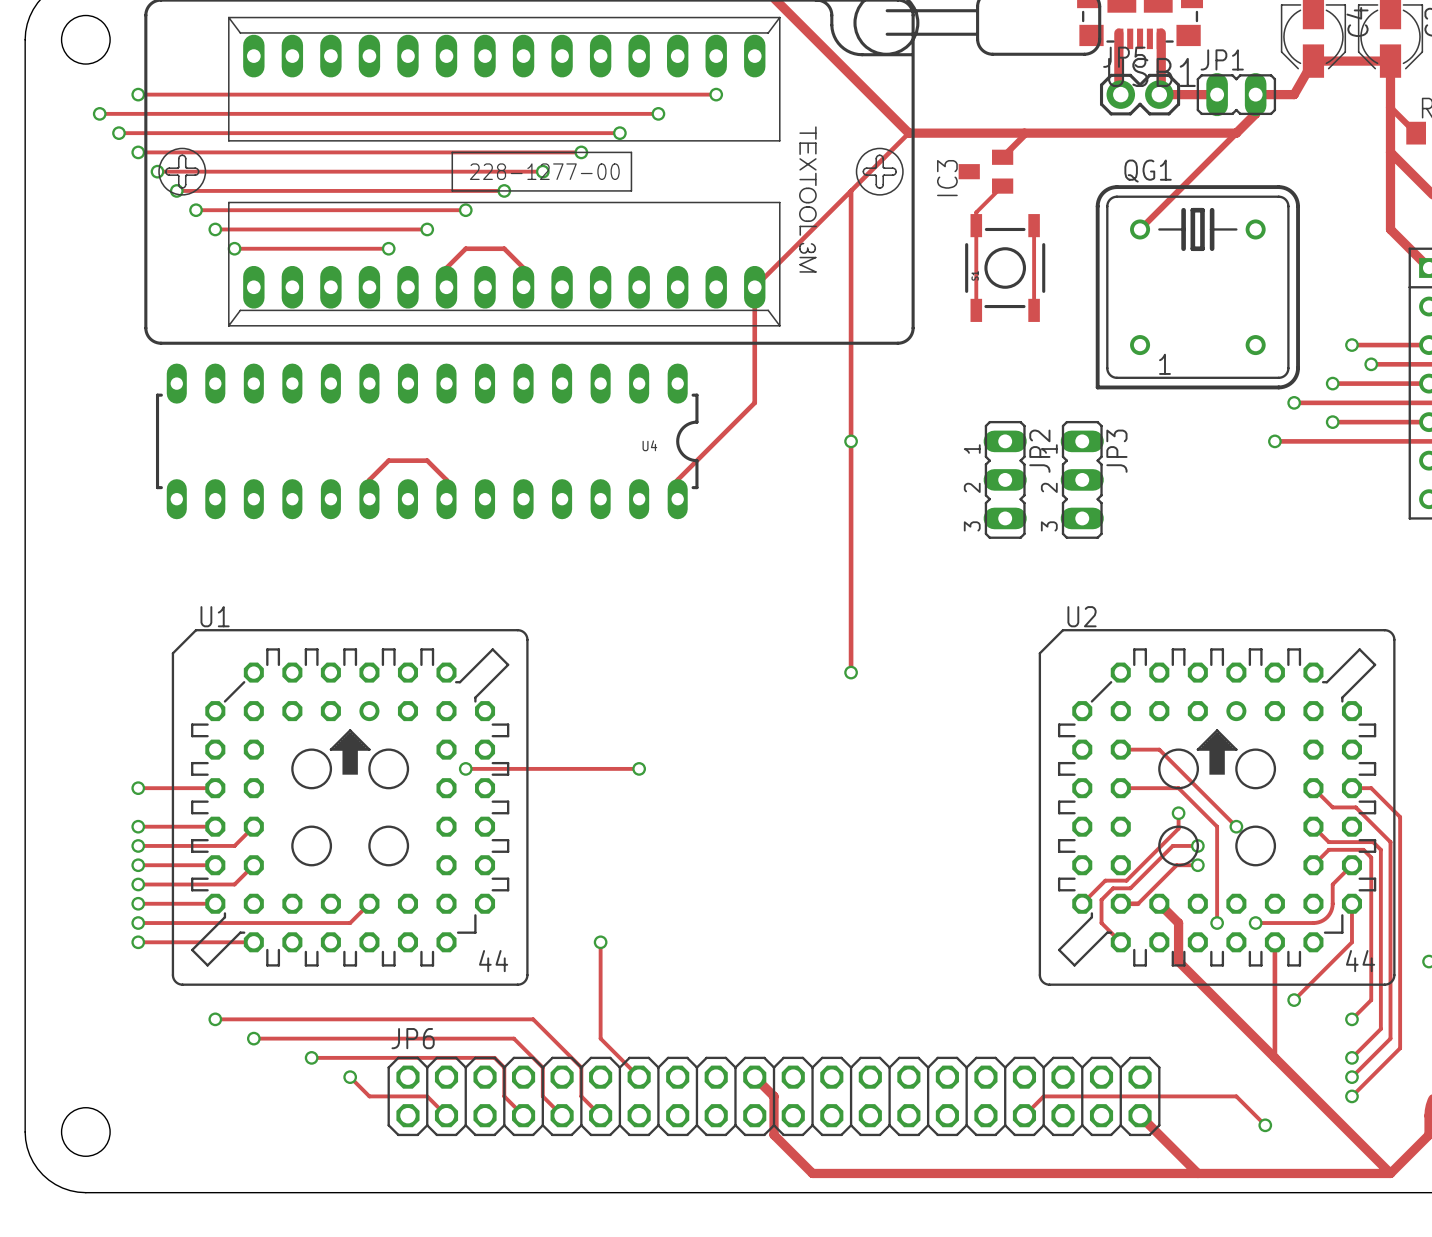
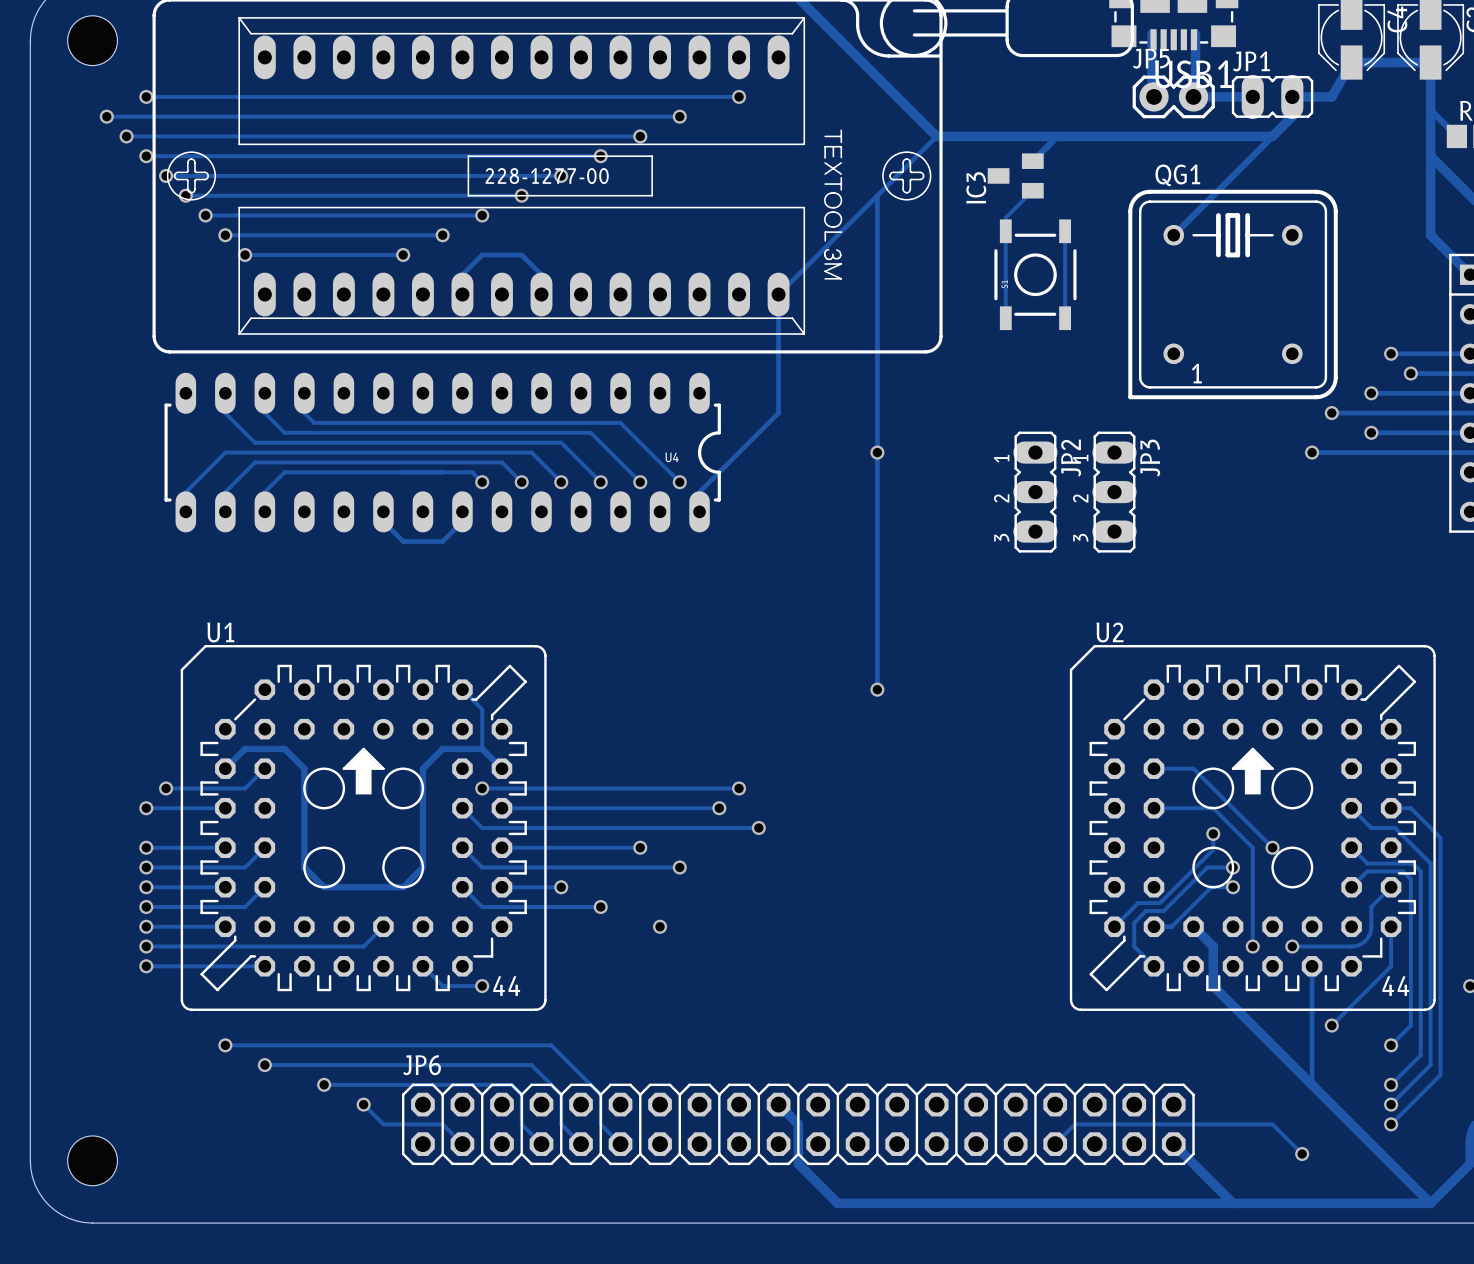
track: none -> (225, 393) (225, 413) (254, 442) (561, 442) (600, 482)
track: none -> (264, 393) (264, 413) (284, 432) (590, 432) (640, 482)
track: none -> (304, 393) (304, 413) (314, 422) (620, 422) (679, 482)
track: (388, 460) (369, 479) (369, 499) -> (462, 511) (462, 521) (442, 541) (403, 541) (383, 521) (383, 511)
track: none -> (403, 472) (284, 472) (264, 492) (264, 511)
track: (427, 460) (446, 479) (446, 499) -> (442, 472) (472, 472) (482, 482)
via: none -> (482, 482)
track: none -> (521, 482) (501, 462) (254, 462) (225, 492) (225, 511)
via: none -> (521, 482)
track: none -> (561, 482) (531, 452) (225, 452) (185, 492) (185, 511)
via: none -> (561, 482)
via: none -> (600, 482)
via: none -> (640, 482)
via: none -> (679, 482)
track: none -> (462, 689) (482, 709) (482, 748)
track: none -> (482, 748) (501, 768)
track: none -> (482, 748) (442, 748) (422, 768) (422, 867) (403, 887) (324, 887) (304, 867) (304, 768) (284, 748) (245, 748) (225, 768)
track: none -> (264, 768) (245, 788) (166, 788)
via: none -> (166, 788)
track: none -> (660, 788) (739, 788)
via: (639, 768) -> none
via: none -> (739, 788)
track: none -> (462, 808) (482, 827) (758, 827)
track: none -> (501, 808) (719, 808)
via: none -> (719, 808)
via: none -> (758, 827)
track: none -> (462, 847) (482, 867) (679, 867)
track: none -> (501, 847) (640, 847)
via: none -> (640, 847)
via: none -> (679, 867)
track: none -> (462, 887) (482, 907) (600, 907)
track: none -> (501, 887) (561, 887)
via: none -> (561, 887)
via: none -> (600, 907)
via: none -> (660, 926)
track: none -> (422, 966) (442, 986) (482, 986)
track: (600, 942) (600, 1038) (639, 1077) -> none
via: (600, 942) -> none
via: none -> (482, 986)

